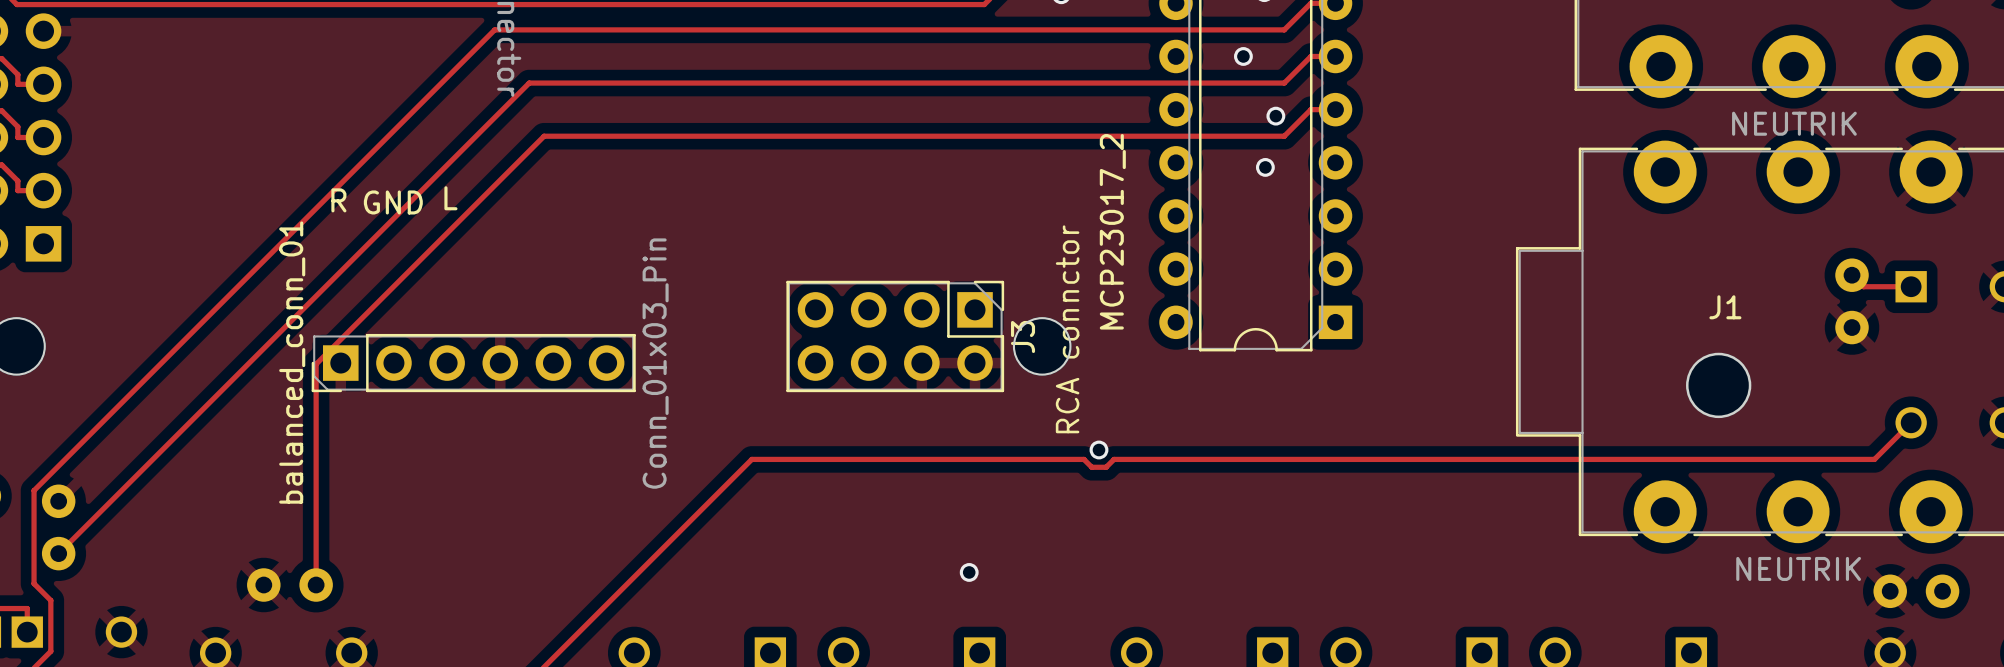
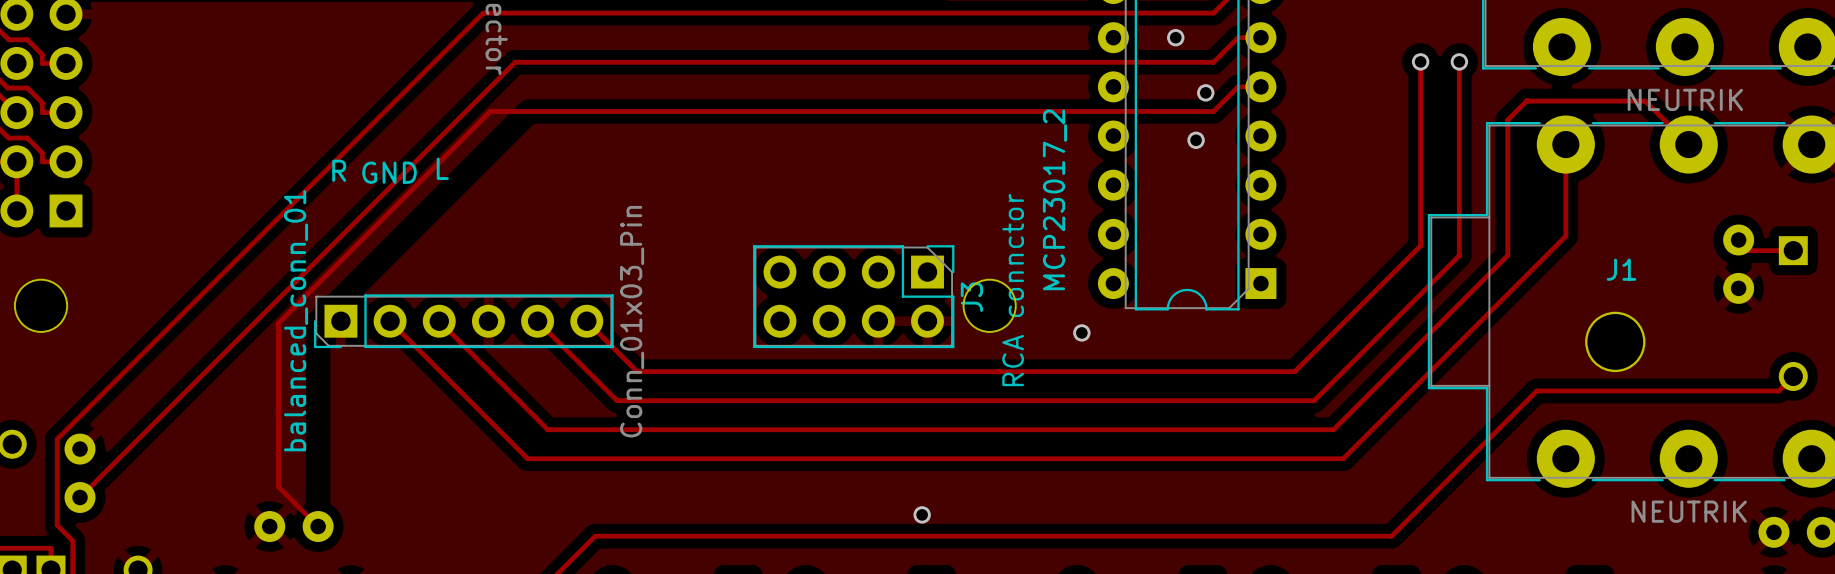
track: none -> (1420, 61) (1420, 245) (1294, 371) (637, 371) (586, 321)
via: none -> (1420, 61)
track: none -> (1459, 61) (1459, 255) (1314, 400) (617, 400) (537, 321)
via: none -> (1459, 61)
track: (544, 136) (316, 364) (316, 585) -> (528, 111) (490, 111) (278, 323) (278, 486) (318, 526)
track: none -> (1565, 144) (1565, 236) (1343, 458) (527, 458) (390, 321)
track: none -> (1688, 144) (1645, 101) (1527, 100) (1507, 119) (1507, 255) (1333, 429) (547, 429) (439, 321)
track: (1895, 438) (1874, 459) (1114, 459) (1106, 467) (1091, 467) (1083, 459) (751, 459) (615, 595) -> (1778, 391) (1536, 391) (1391, 536) (595, 536)
via position: (1098, 449) -> (1081, 332)

